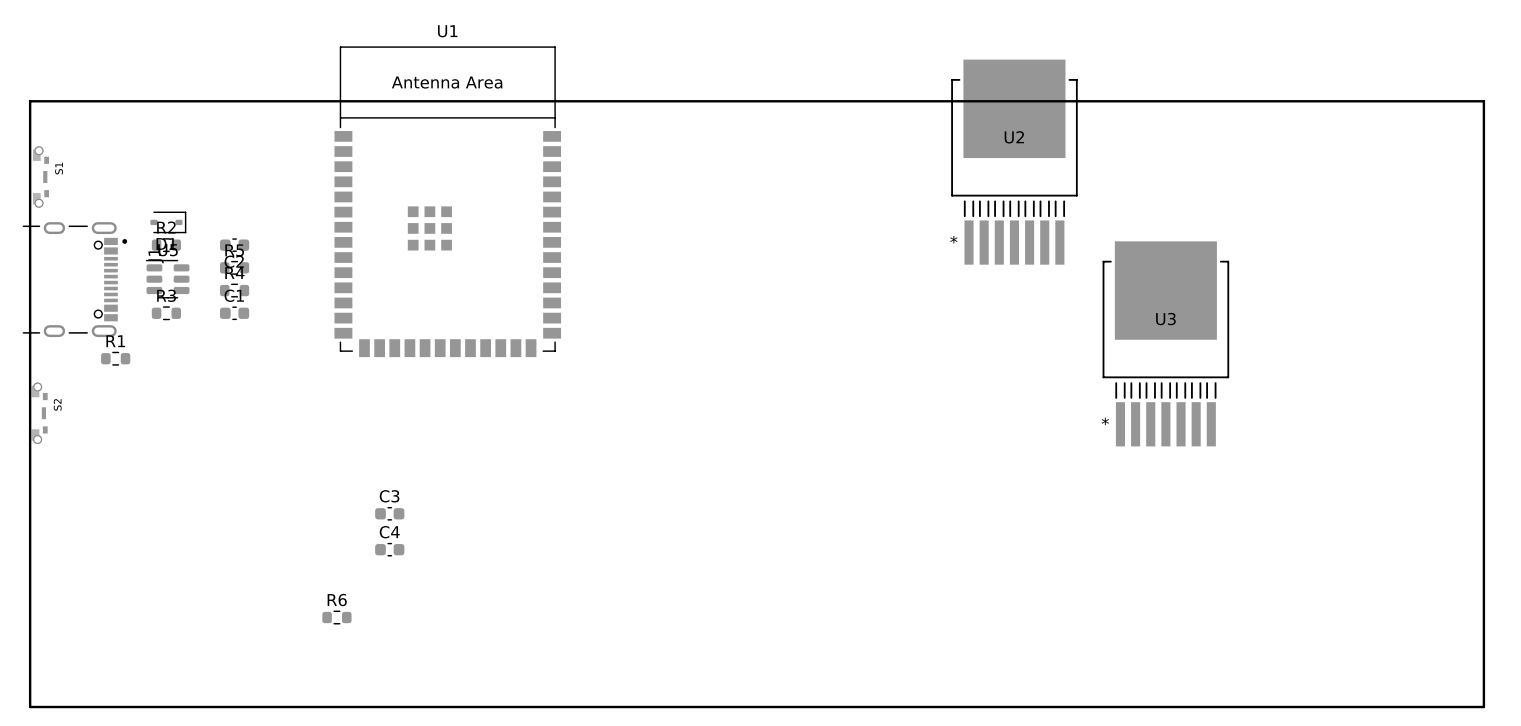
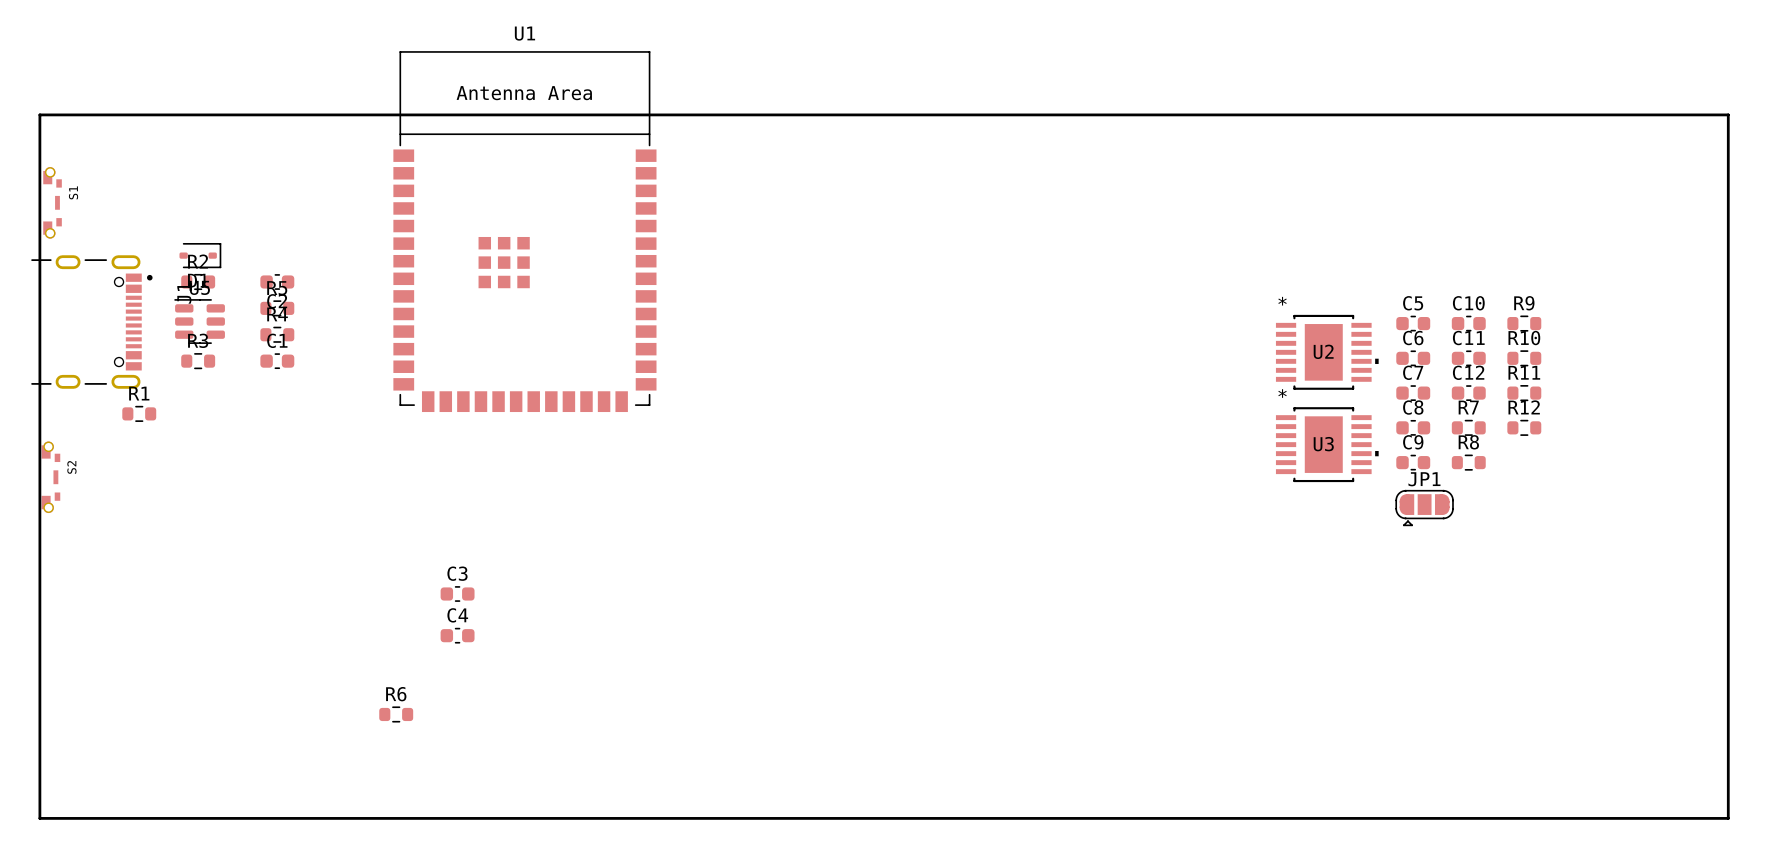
U2 footprint: [951, 59, 1078, 265] -> [1275, 314, 1379, 390]
U2 name position: U2 (1014, 137) -> U2 (1323, 351)
U3 footprint: [1102, 241, 1230, 447] -> [1275, 407, 1379, 483]
C5: none -> (1413, 323)
C10: none -> (1468, 323)
R9: none -> (1524, 323)
C6: none -> (1413, 358)
C11: none -> (1468, 358)
R10: none -> (1524, 358)
U3 name position: U3 (1165, 319) -> U3 (1323, 444)
C7: none -> (1413, 393)
C12: none -> (1468, 393)
R11: none -> (1524, 393)
C8: none -> (1413, 427)
R7: none -> (1468, 427)
R12: none -> (1524, 427)
C9: none -> (1413, 462)
R8: none -> (1468, 462)
JP1: none -> (1424, 508)

